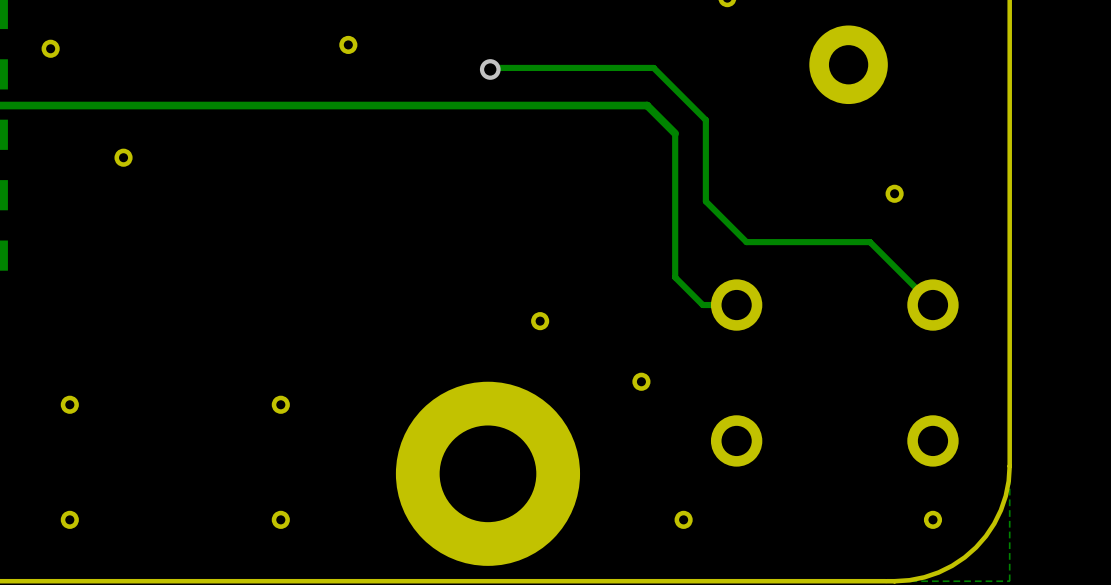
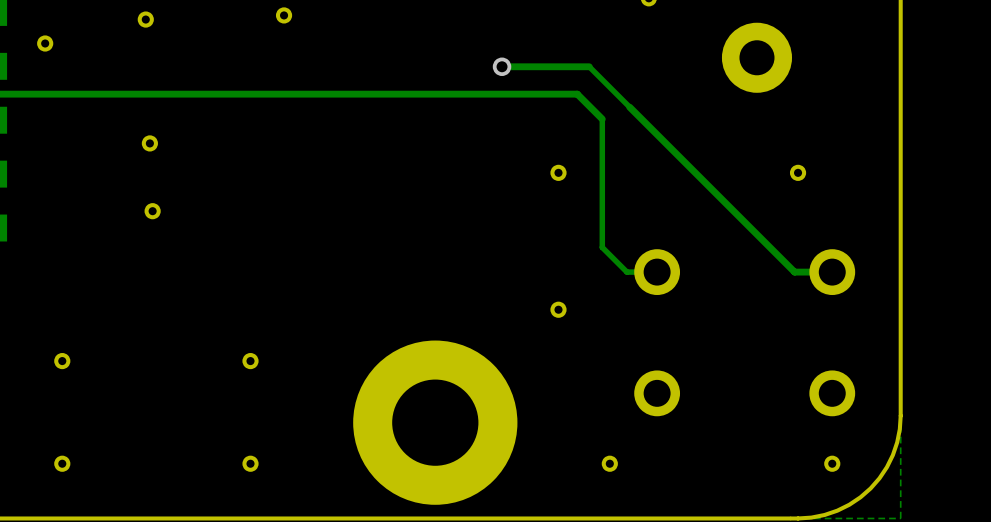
part: none -> (284, 15)
part: none -> (145, 19)
part: (348, 44) -> none
track: (490, 69) (491, 67) (653, 67) (660, 74) -> (502, 66) (589, 66)
via position: (490, 69) -> (502, 66)
track: (705, 120) (705, 201) (746, 242) (870, 242) (932, 305) -> (629, 107) (794, 272) (832, 272)
part position: (123, 157) -> (149, 143)
part: none -> (558, 172)
part: none -> (152, 211)
part: (540, 321) -> none
part position: (641, 381) -> (558, 309)

